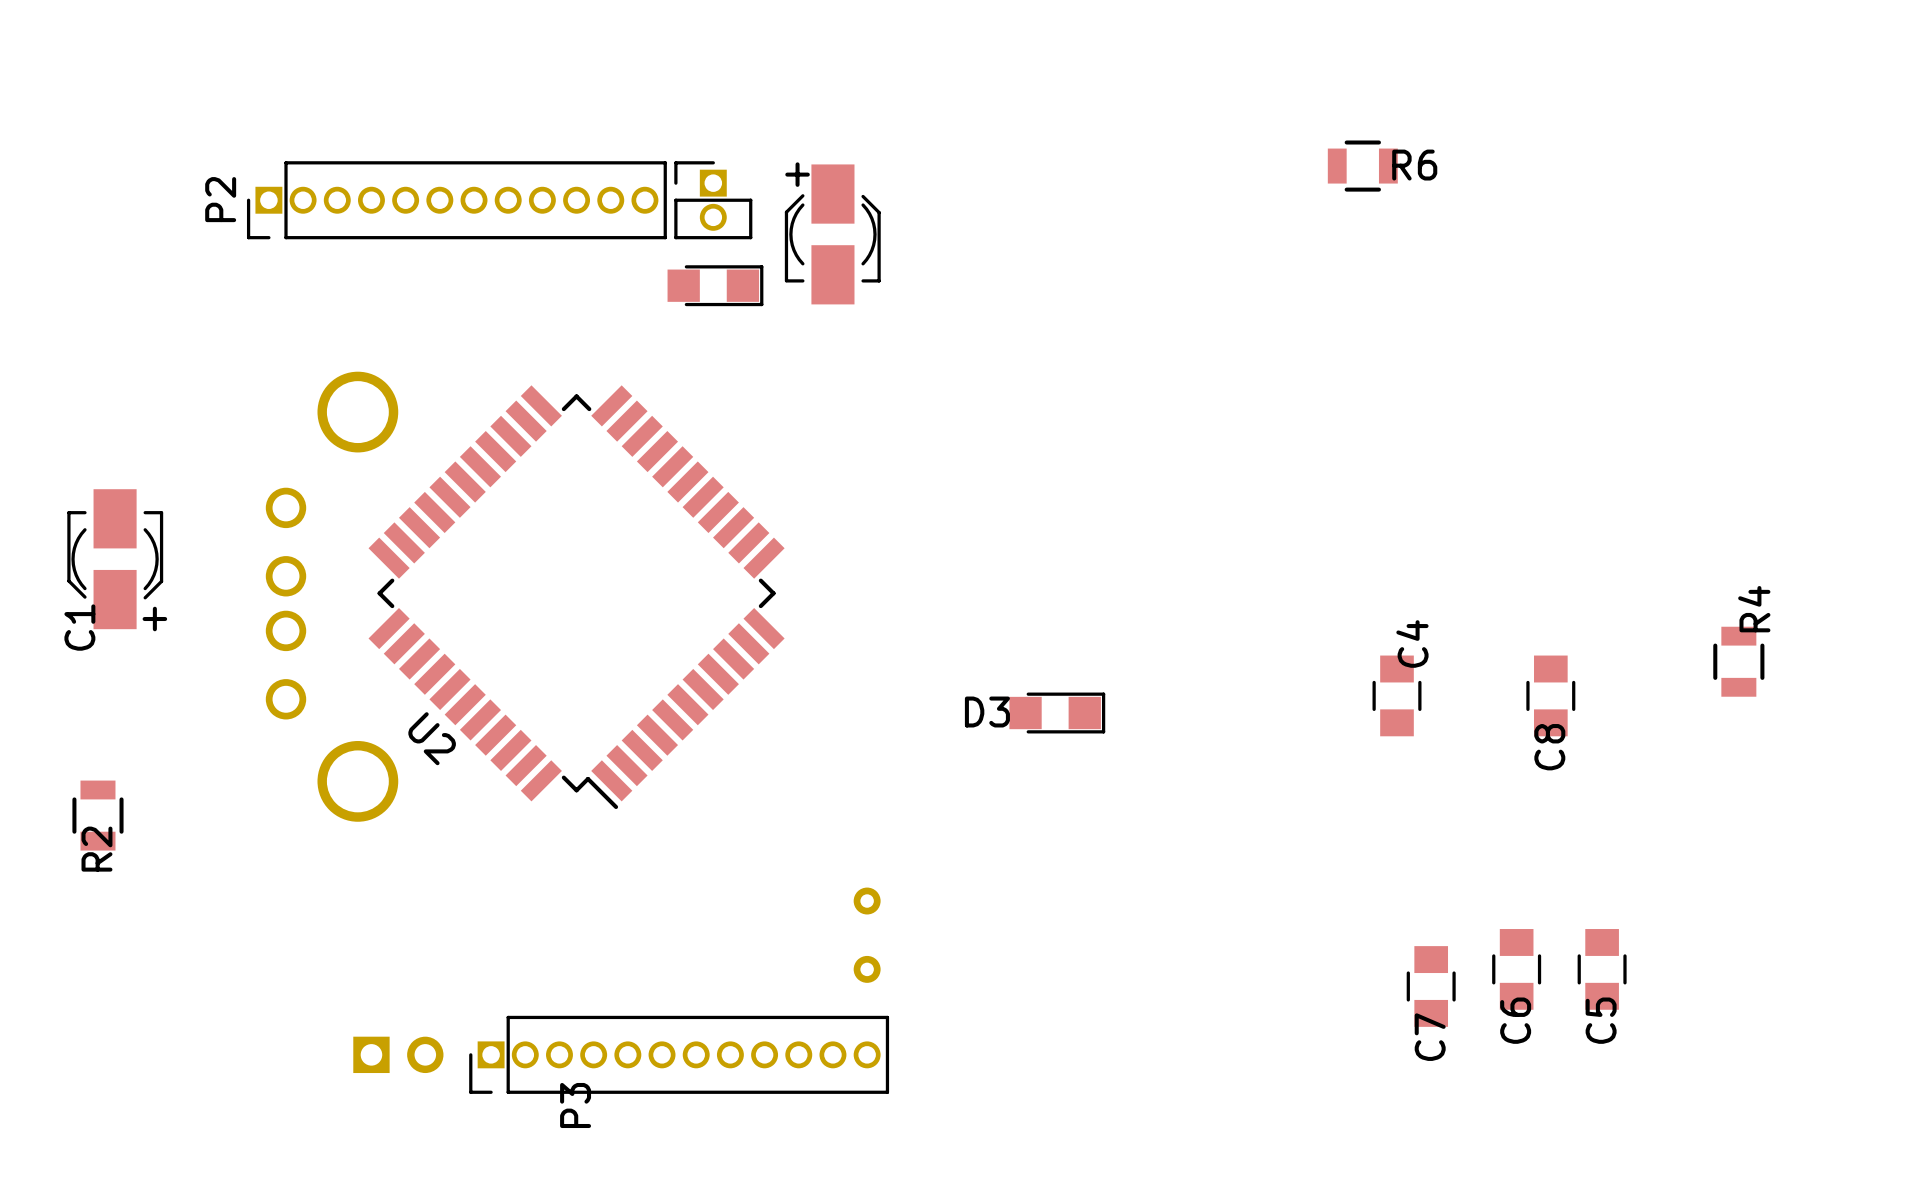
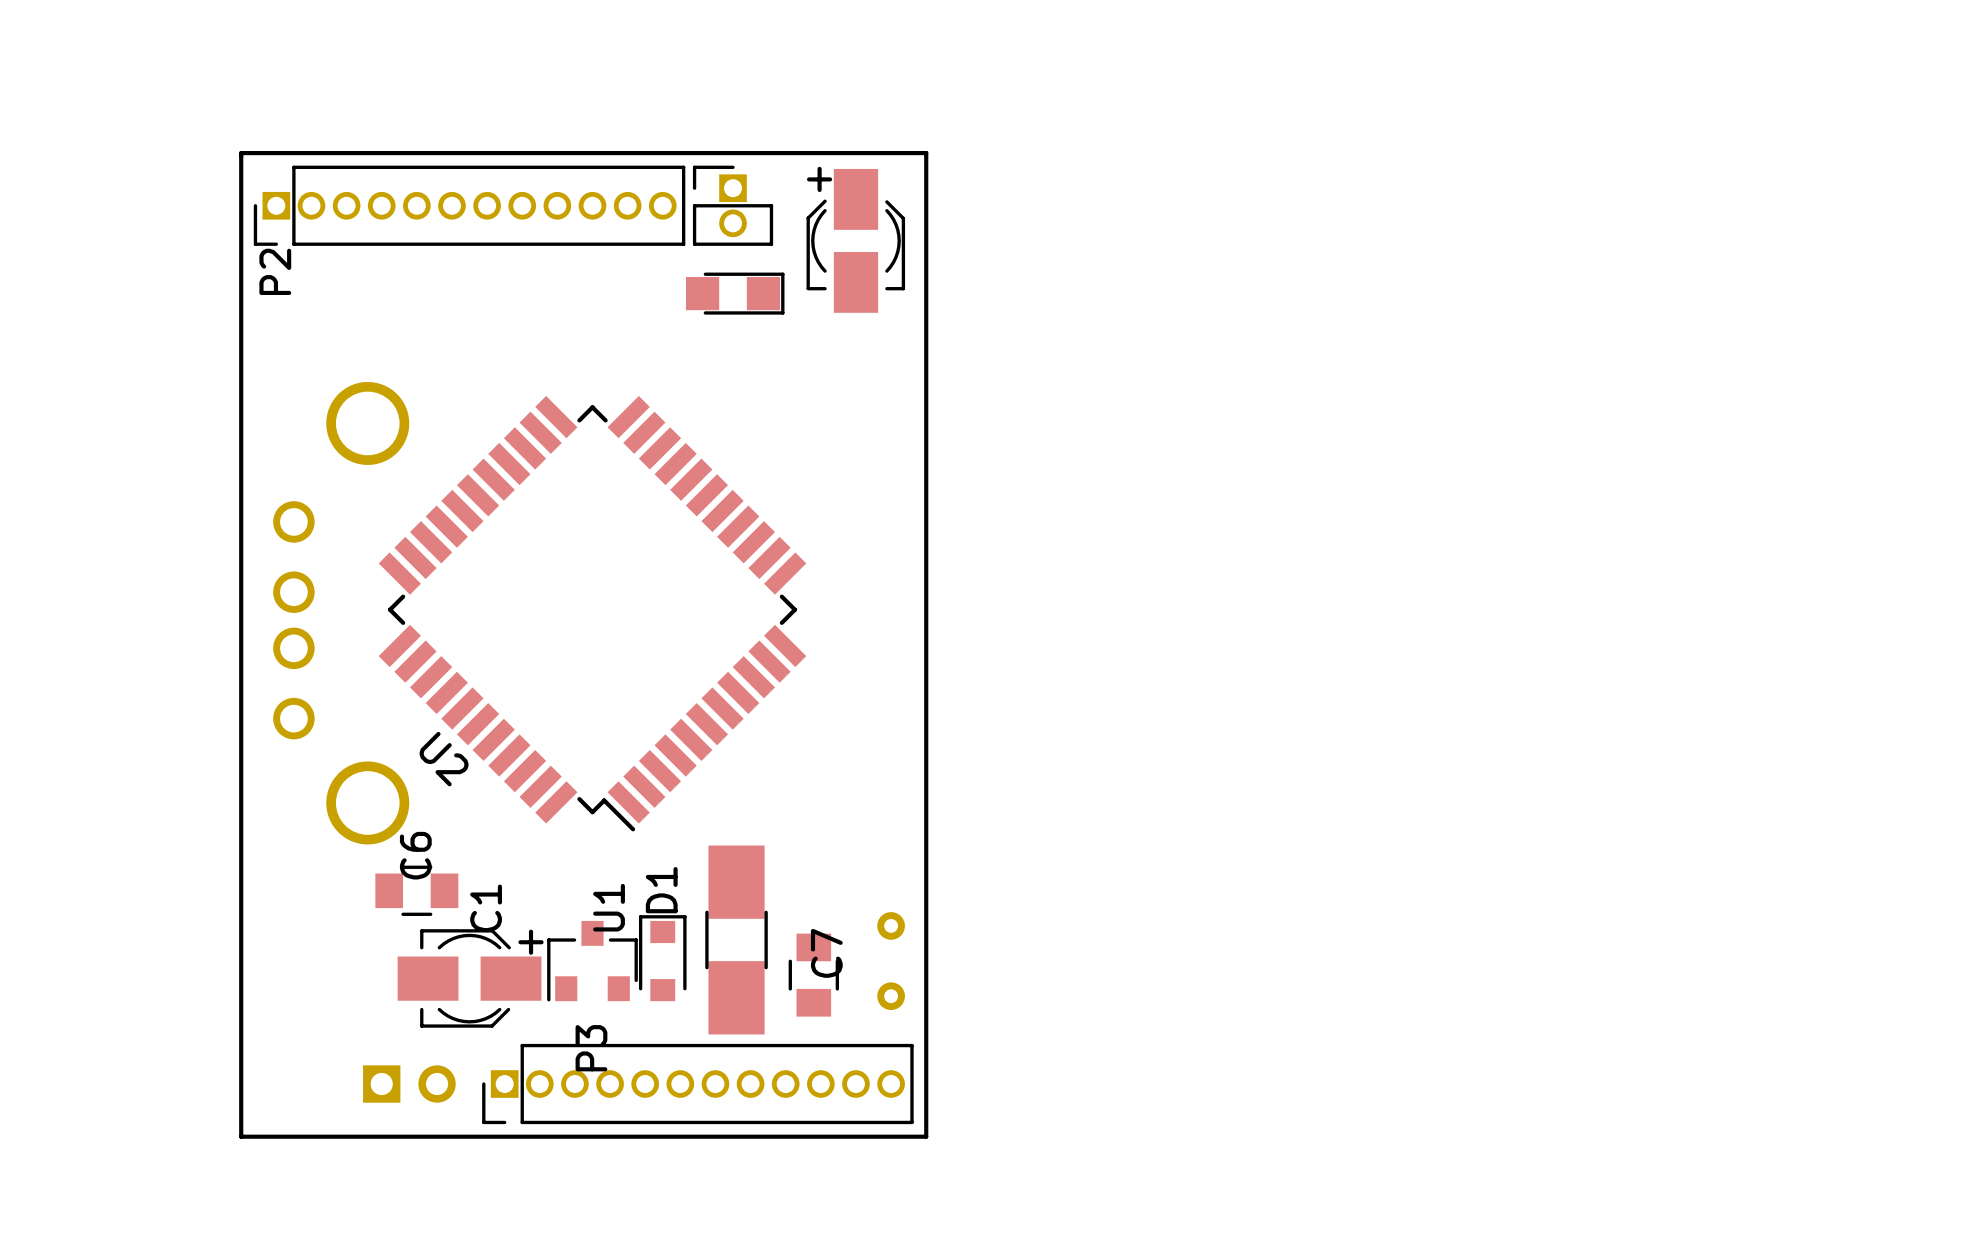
board edge: none -> (241, 153) (926, 153) (926, 1136) (241, 1136) (241, 153)
R6: (1362, 166) -> none
P2 name position: P2 (220, 199) -> P2 (275, 271)
C1 rotation: 0° (115, 559) -> 90° counterclockwise (469, 978)
C1 position: (115, 559) -> (469, 978)
C1 name position: C1 (79, 627) -> C1 (486, 908)
R4: (1738, 661) -> none
C4: (1397, 695) -> none
C8: (1550, 695) -> none
D3: (1057, 713) -> none
R2: (97, 815) -> none
part: none -> (736, 939)
D1: none -> (662, 958)
U1: none -> (592, 961)
C6 rotation: 0° (1516, 969) -> 90° clockwise (416, 890)
C6 position: (1516, 969) -> (416, 890)
C5: (1602, 969) -> none
C7 position: (1431, 986) -> (813, 975)
C6 name position: C6 (1515, 1020) -> C6 (415, 855)
C7 name position: C7 (1430, 1037) -> C7 (826, 953)
P3 name position: P3 (575, 1105) -> P3 (591, 1048)

